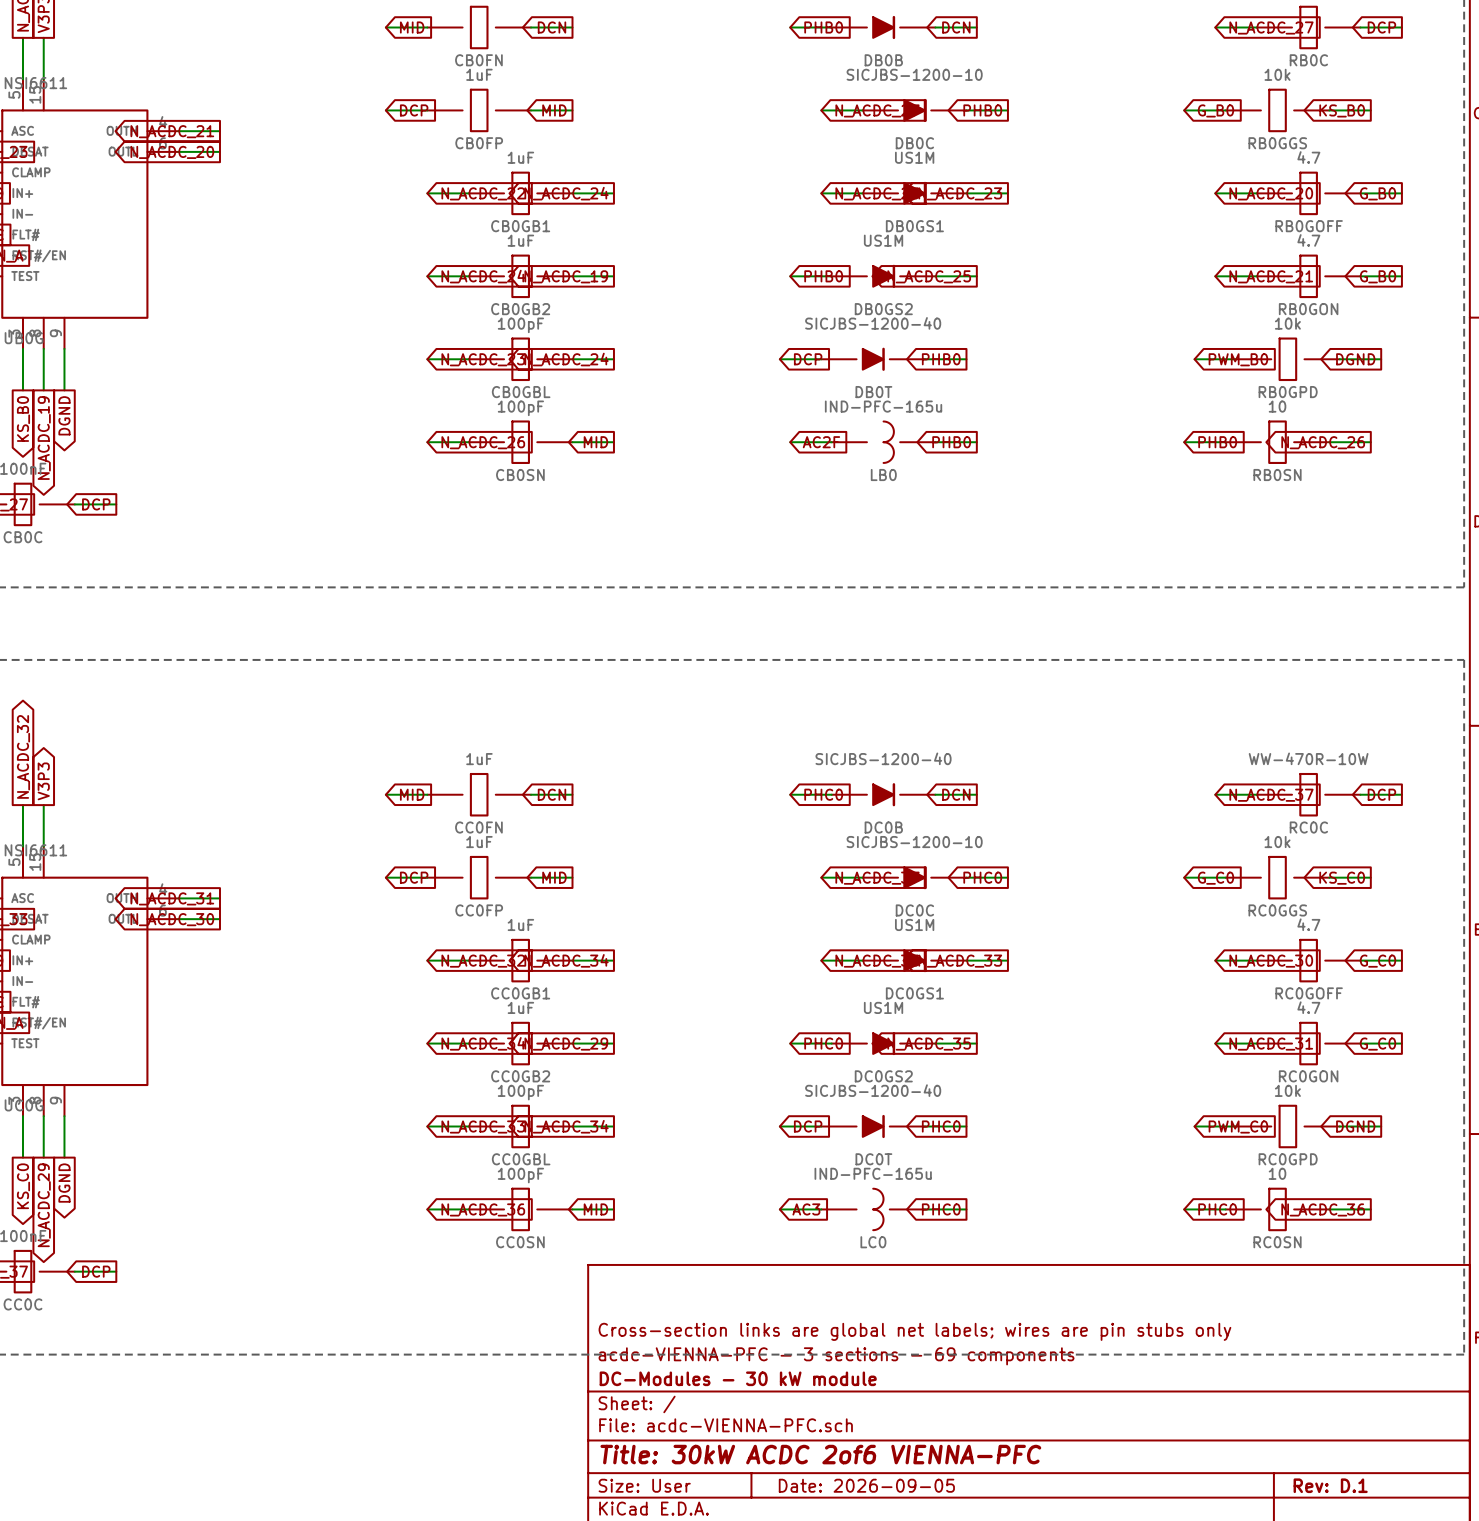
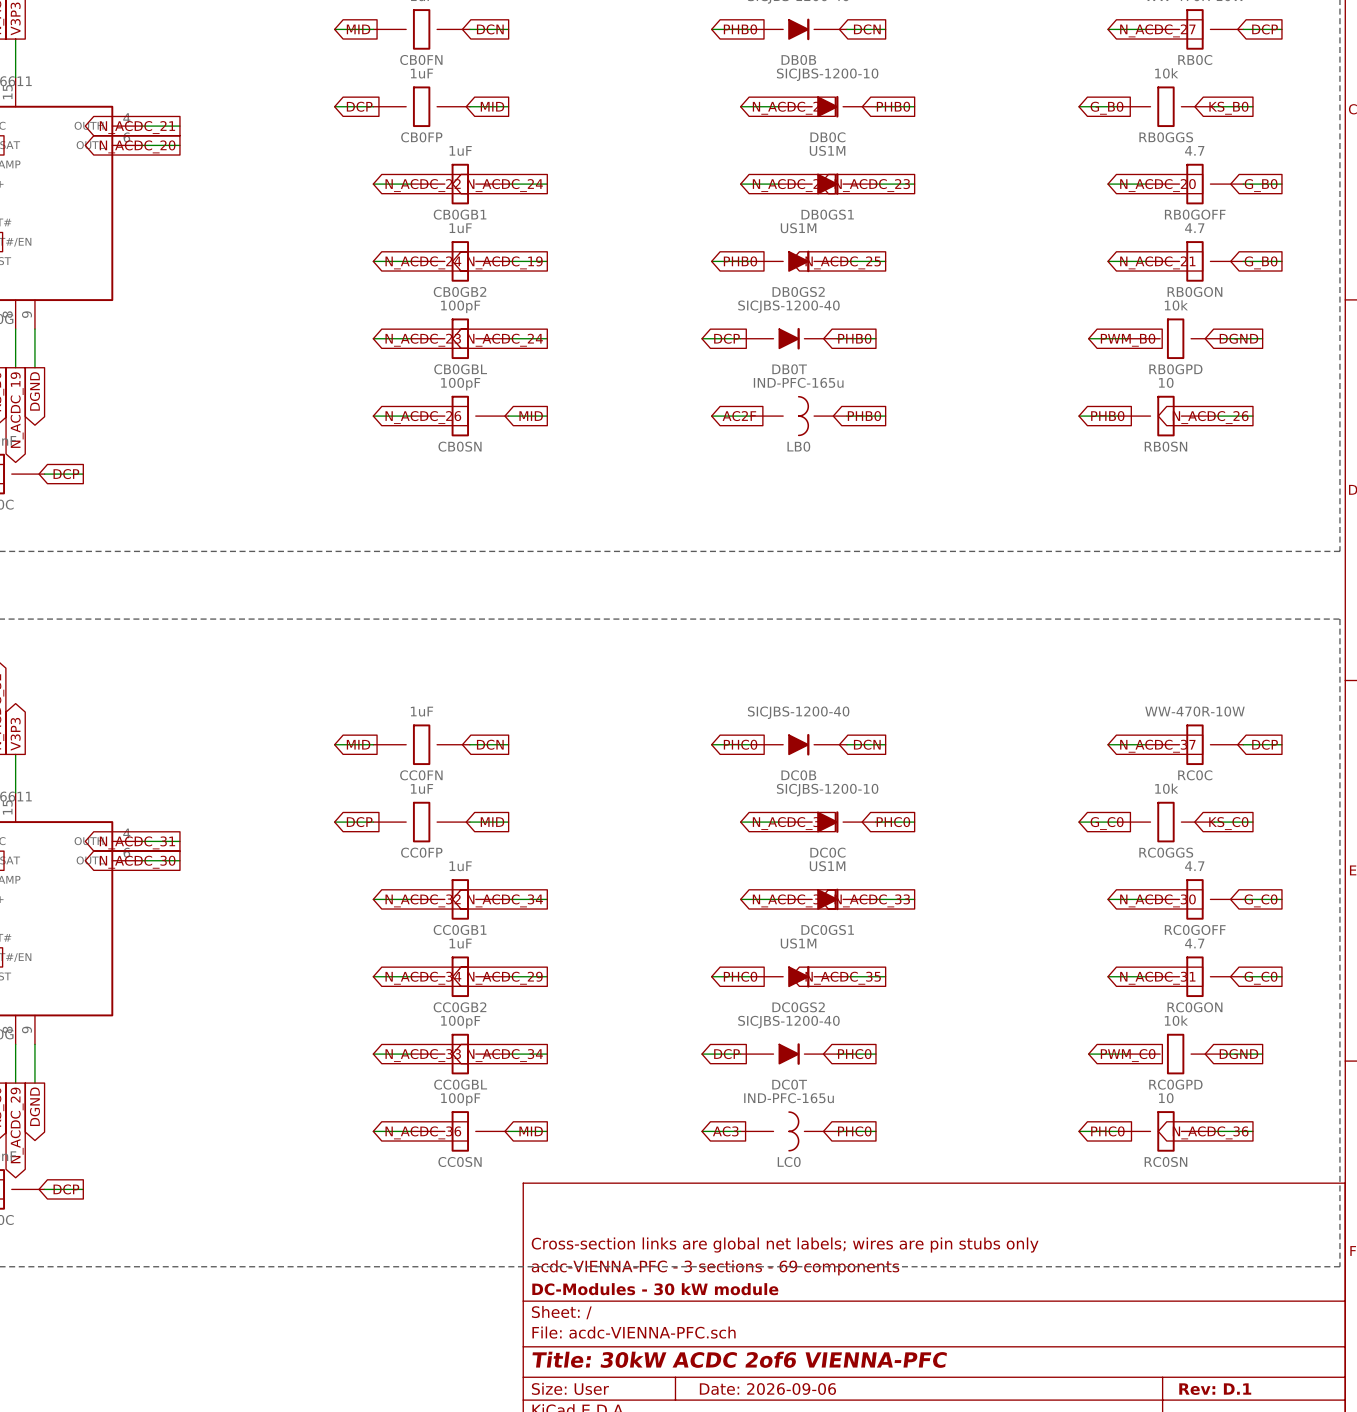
title block: Date: 2026-09-05 (866, 1485) -> Date: 2026-09-06 (767, 1389)

